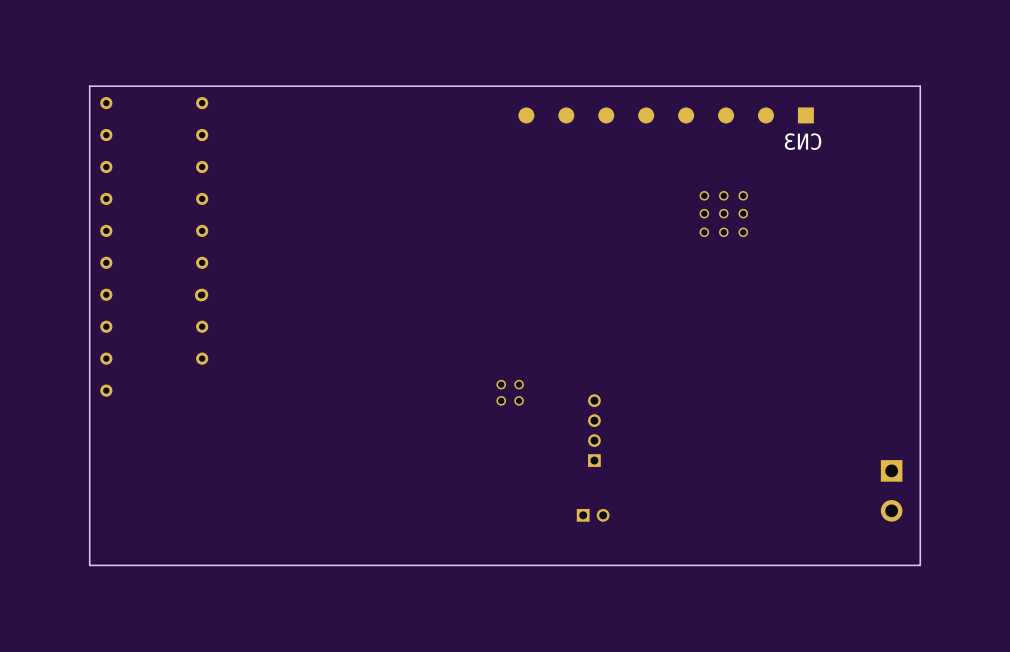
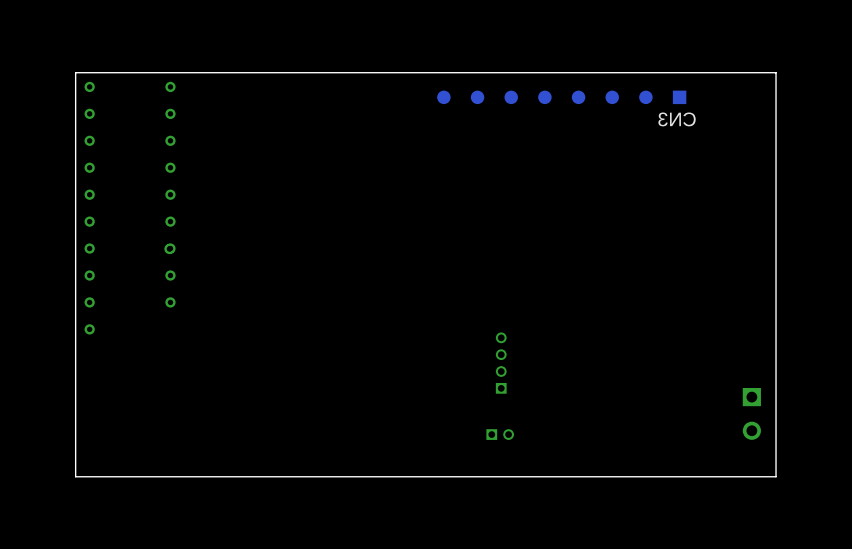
part: (723, 214) -> none
part: (510, 392) -> none

